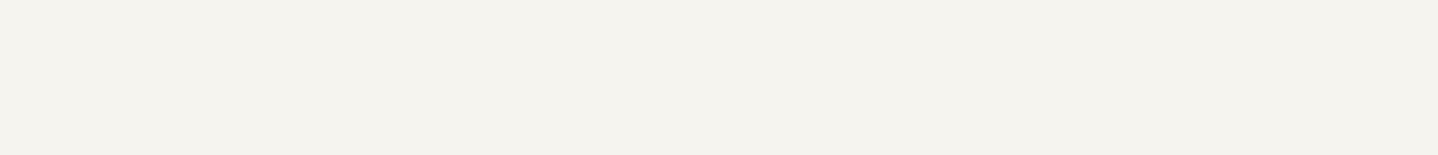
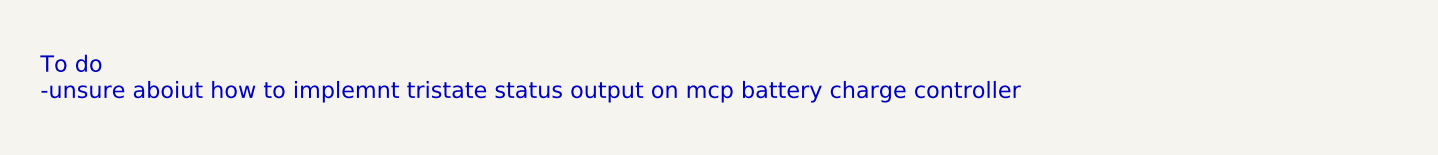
text: none -> To do (70, 63)
text: none -> -unsure aboiut how to implemnt tristate status output on mcp battery charge controller (531, 91)

